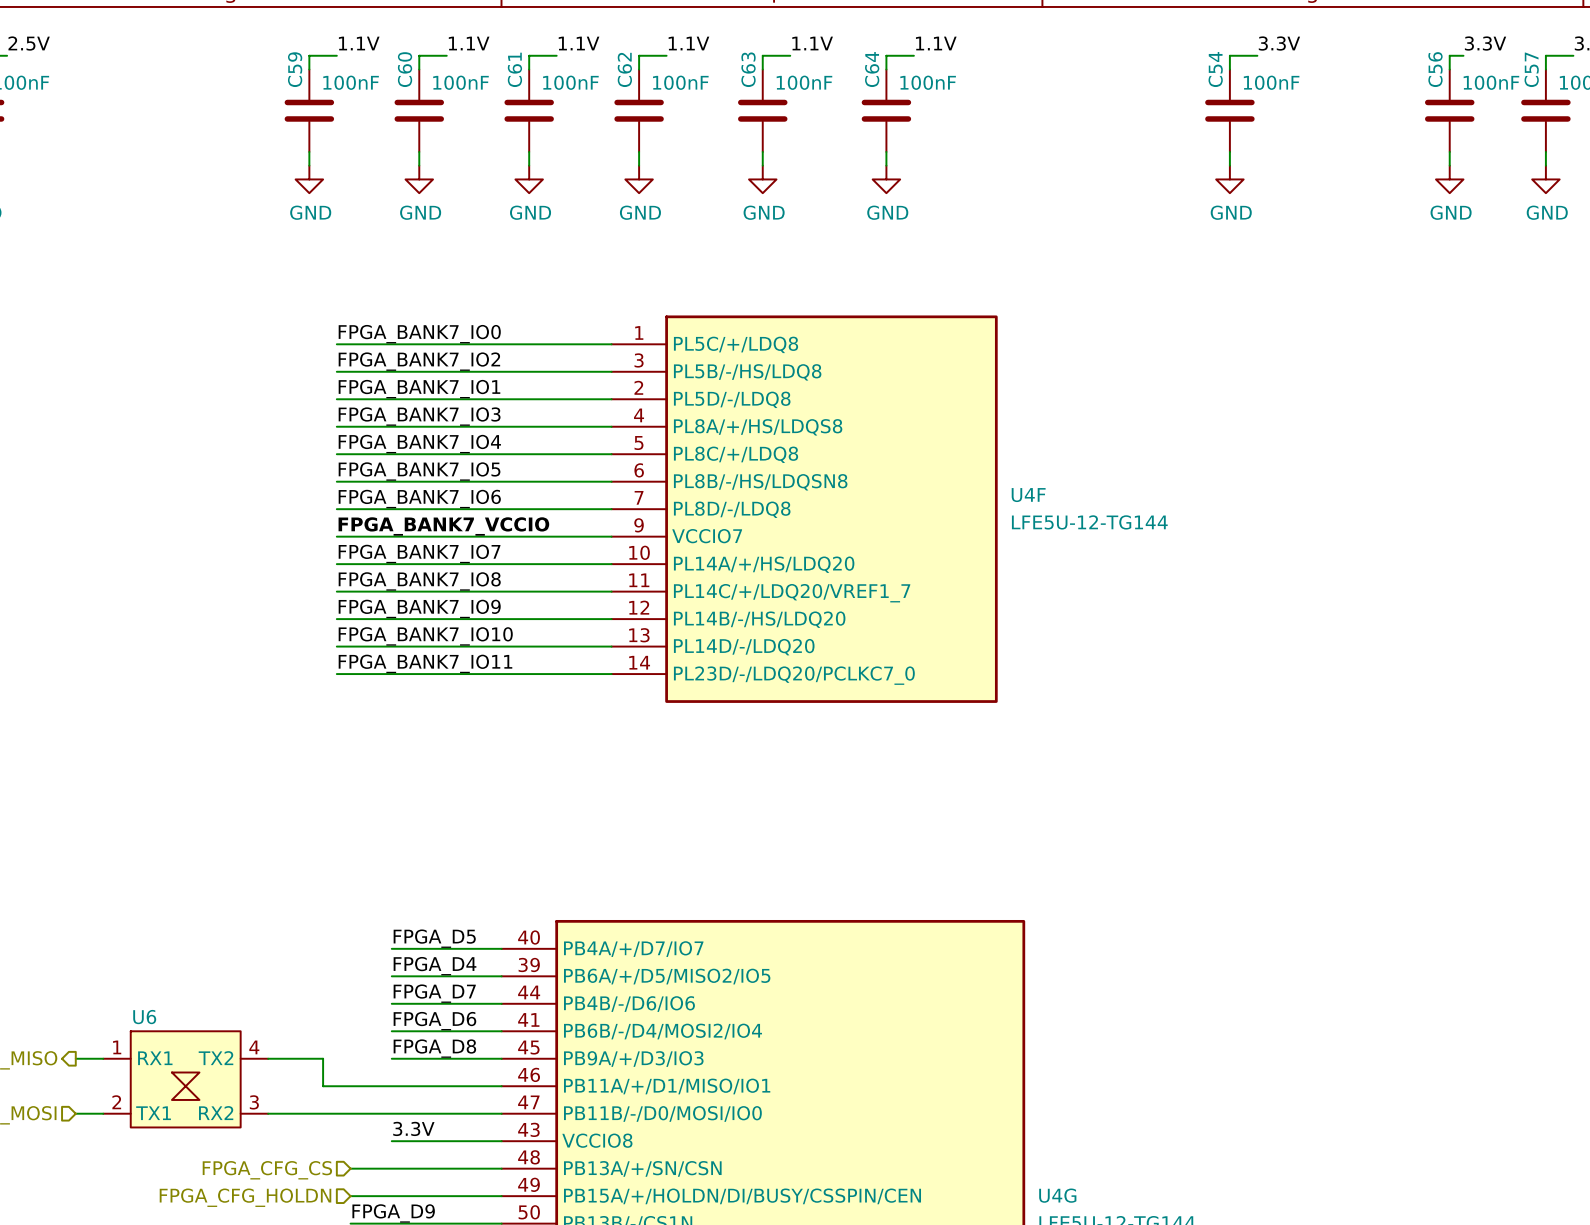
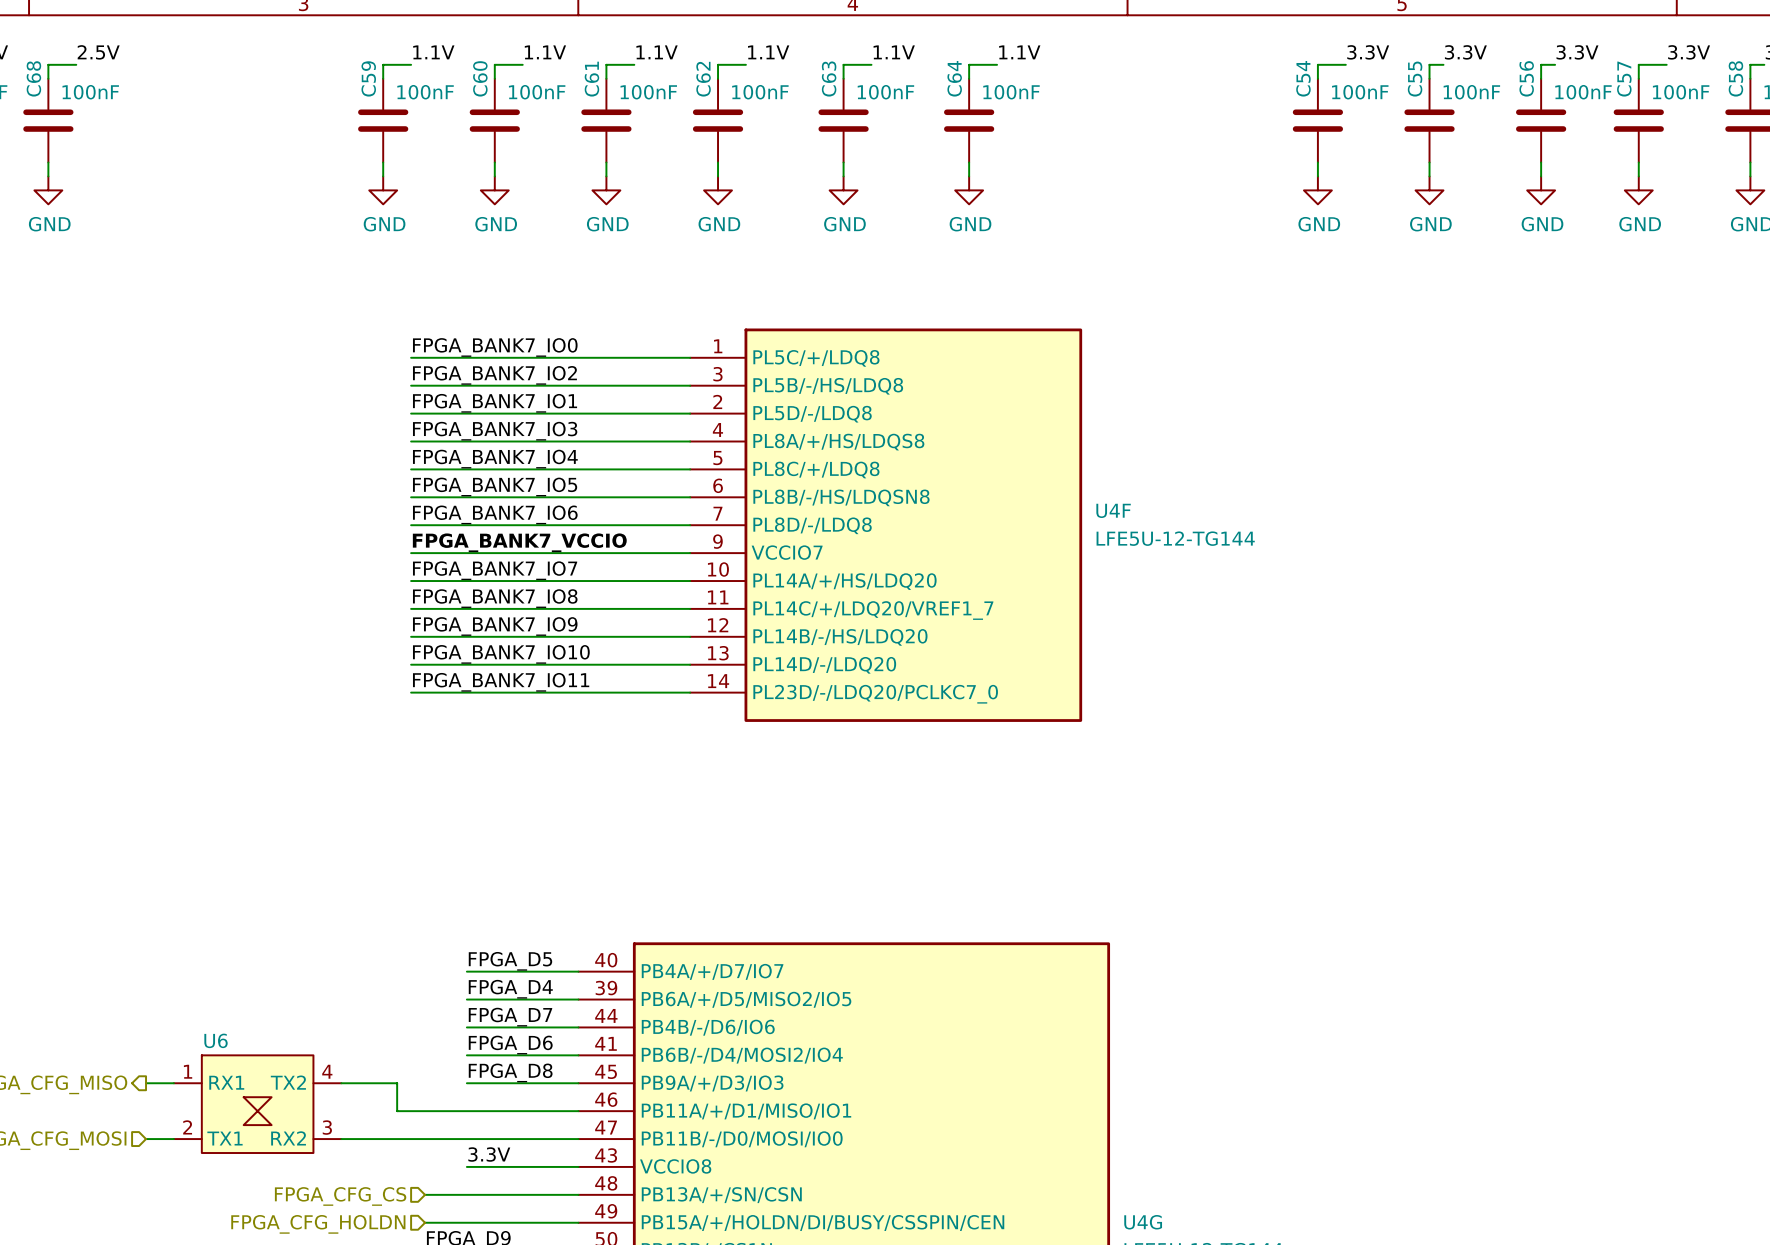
label: none -> 3.3V (1465, 52)
wire: none -> (1443, 64) (1429, 64) (1429, 78)
C55: none -> 100nF (1429, 120)
wire: none -> (1429, 162) (1429, 176)
power symbol: none -> GND (1429, 190)

